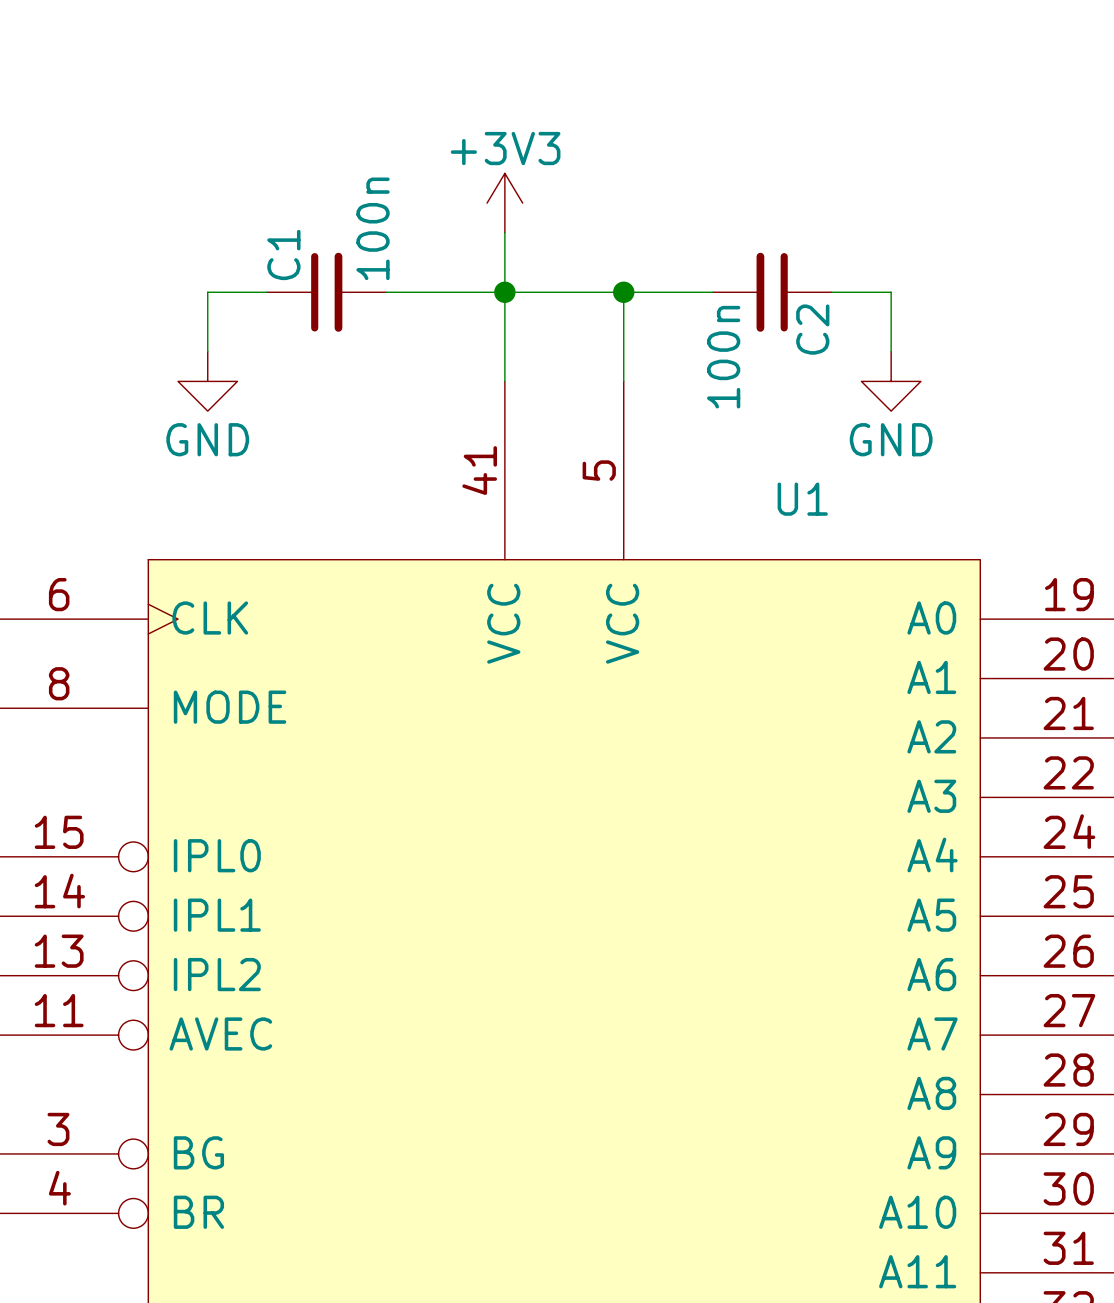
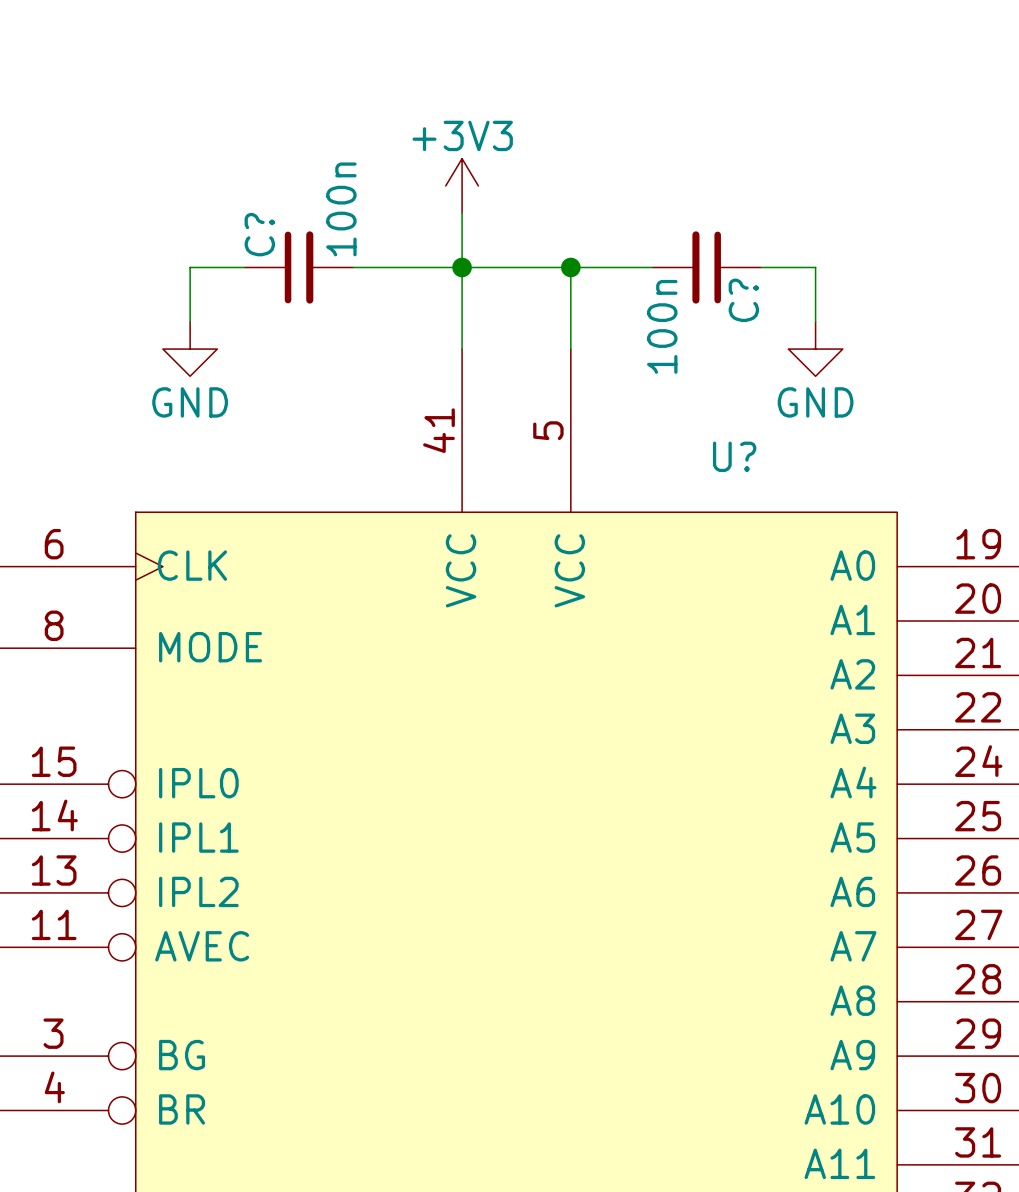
C1 name: C1 (283, 254) -> C? (259, 234)
C2 name: C2 (812, 329) -> C? (743, 300)
U1 name: U1 (802, 499) -> U? (734, 456)

